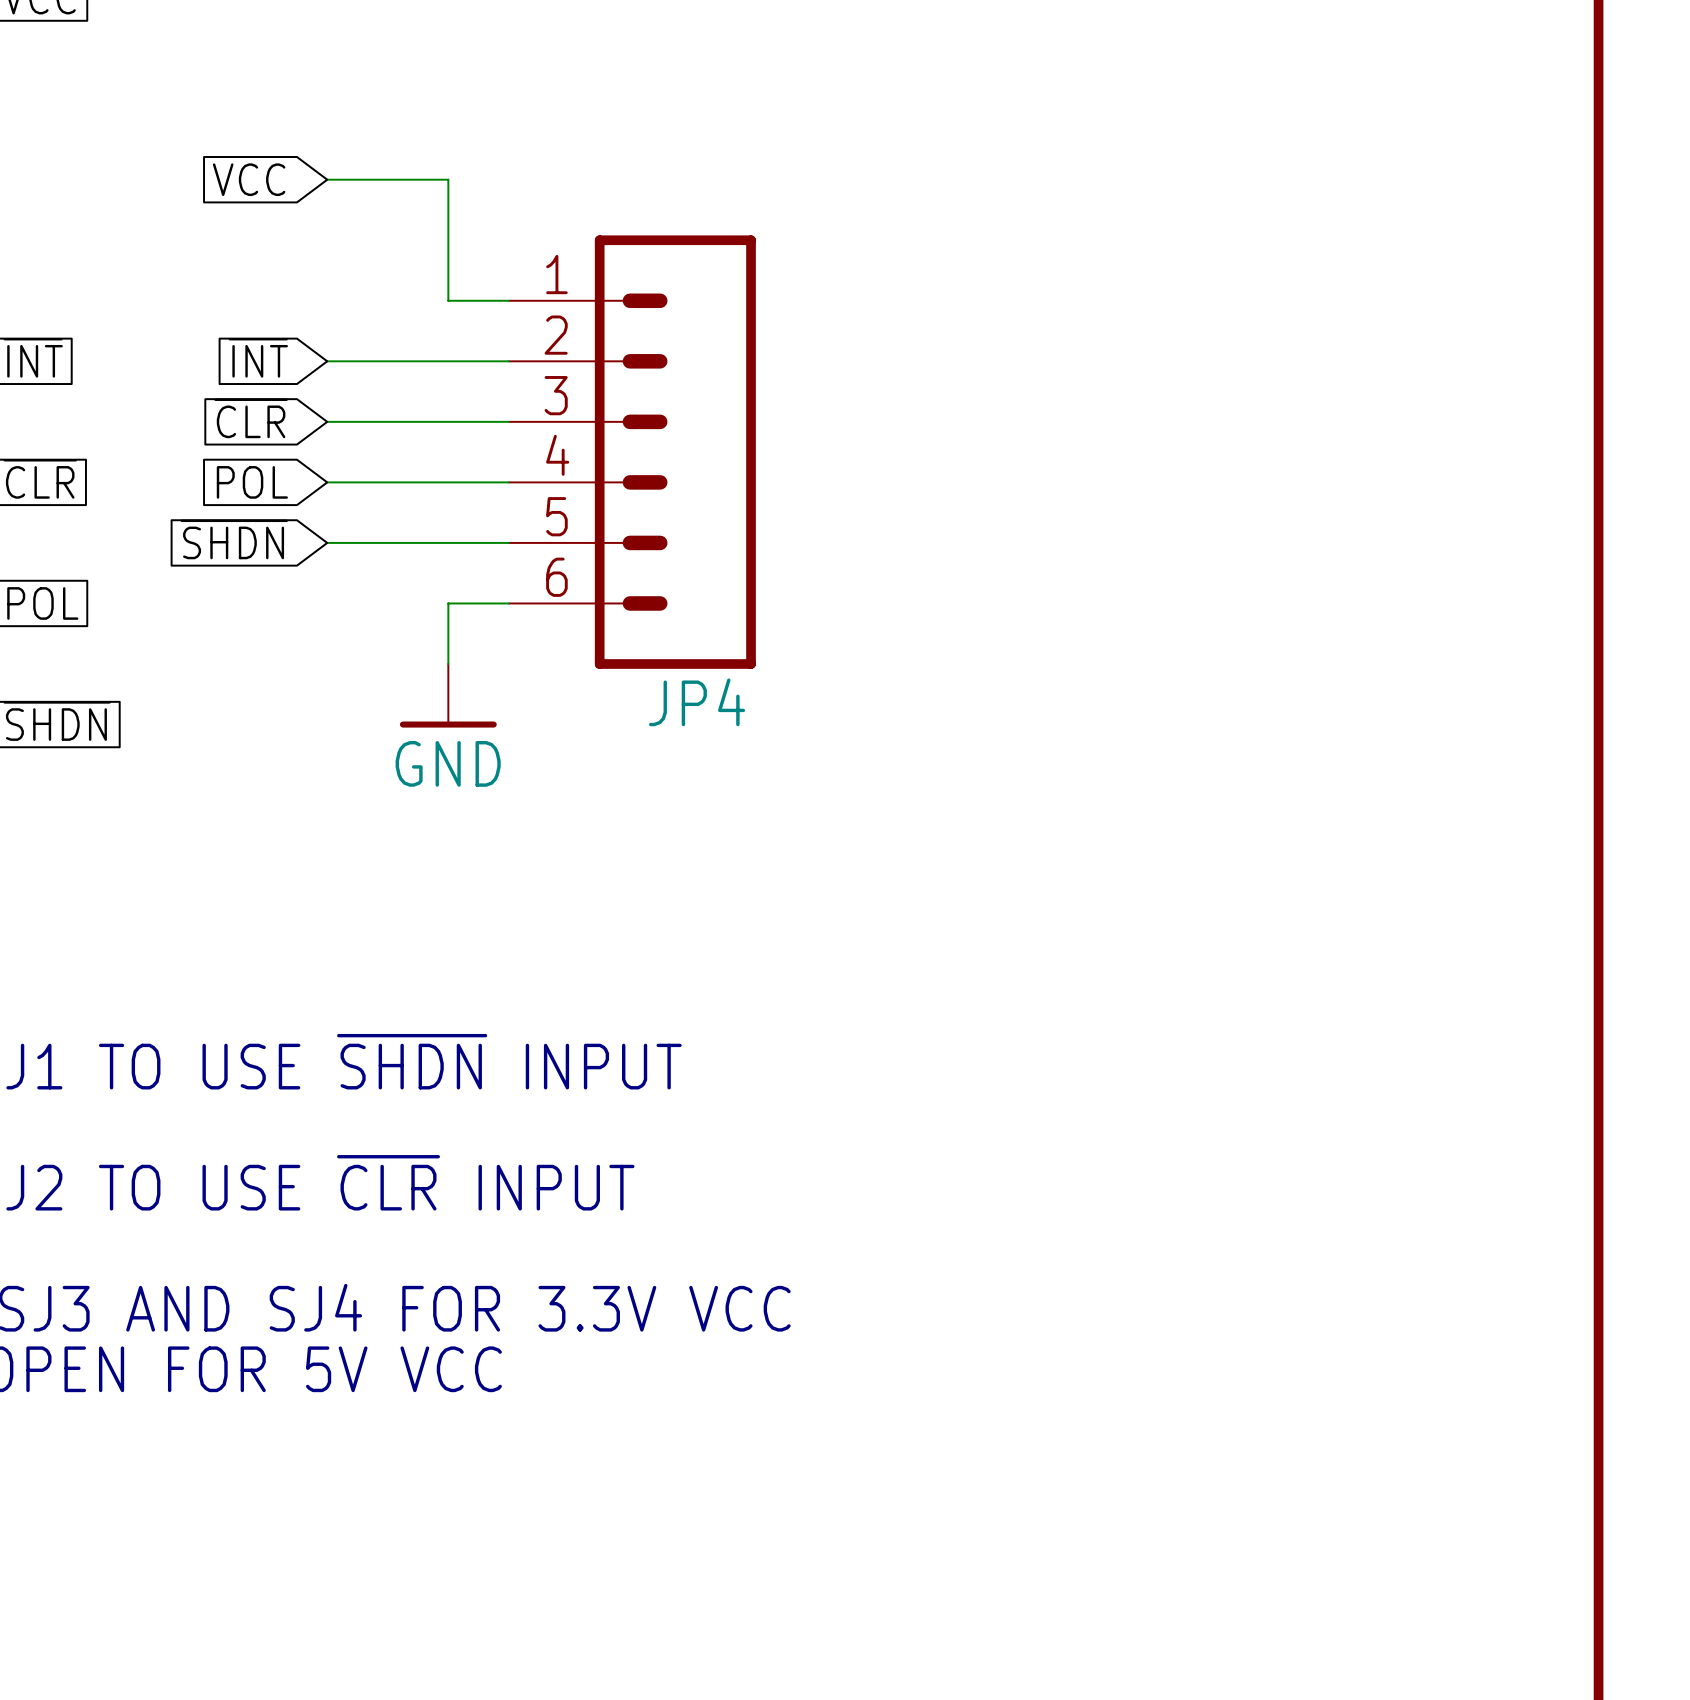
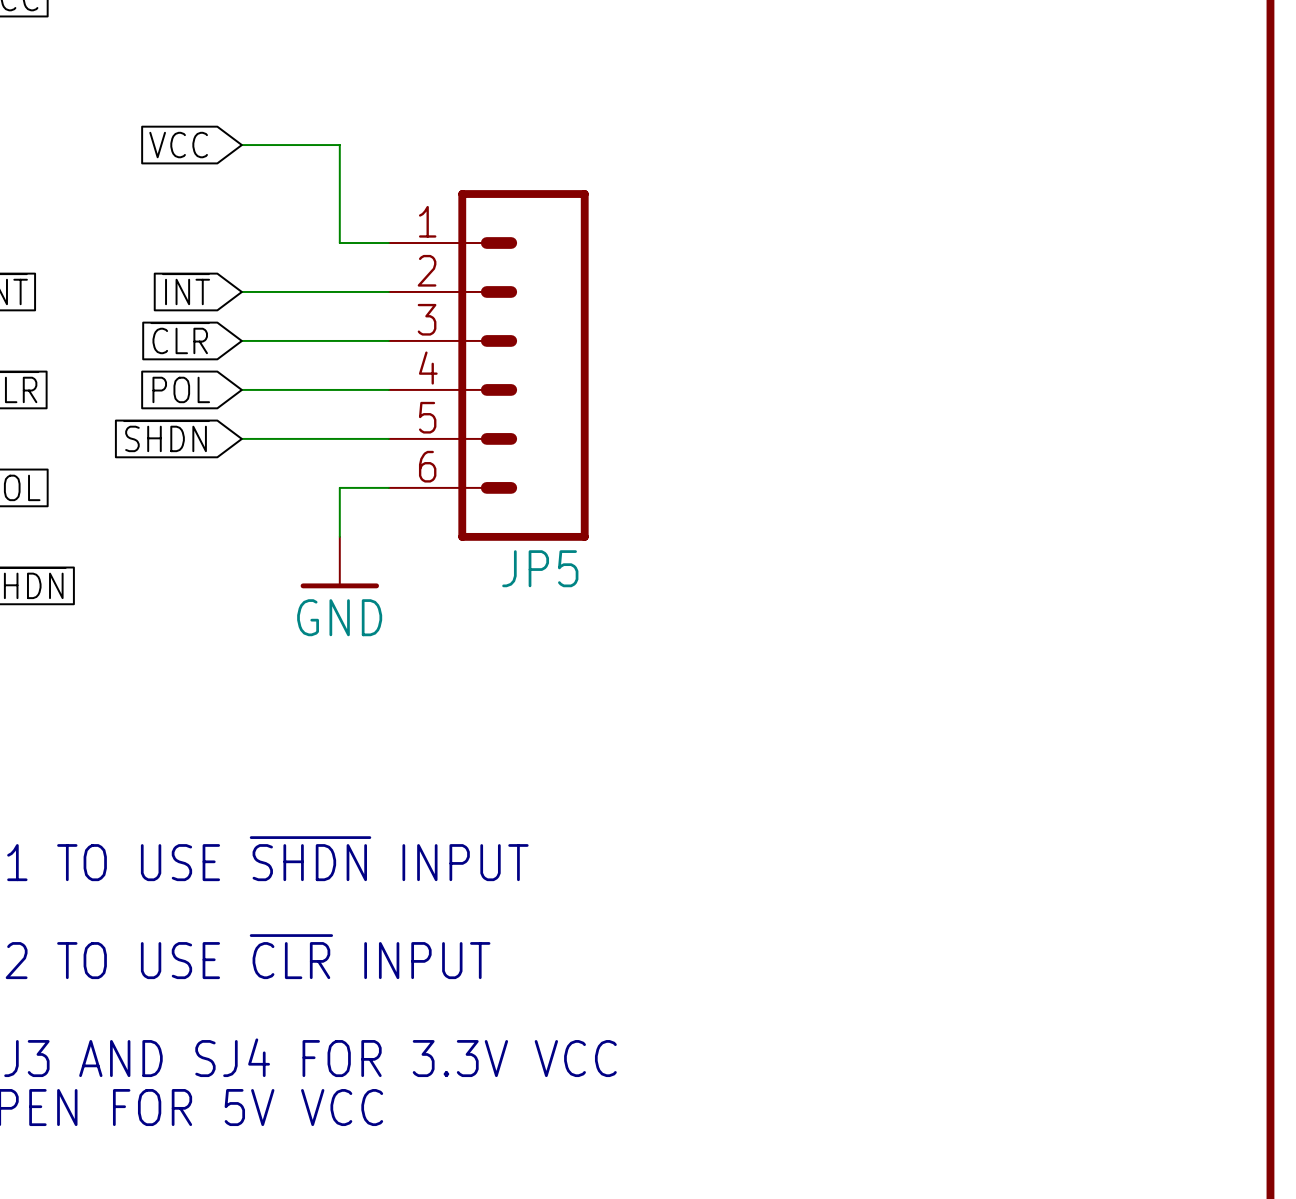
JP4 name: JP4 (697, 702) -> JP5 (540, 568)

